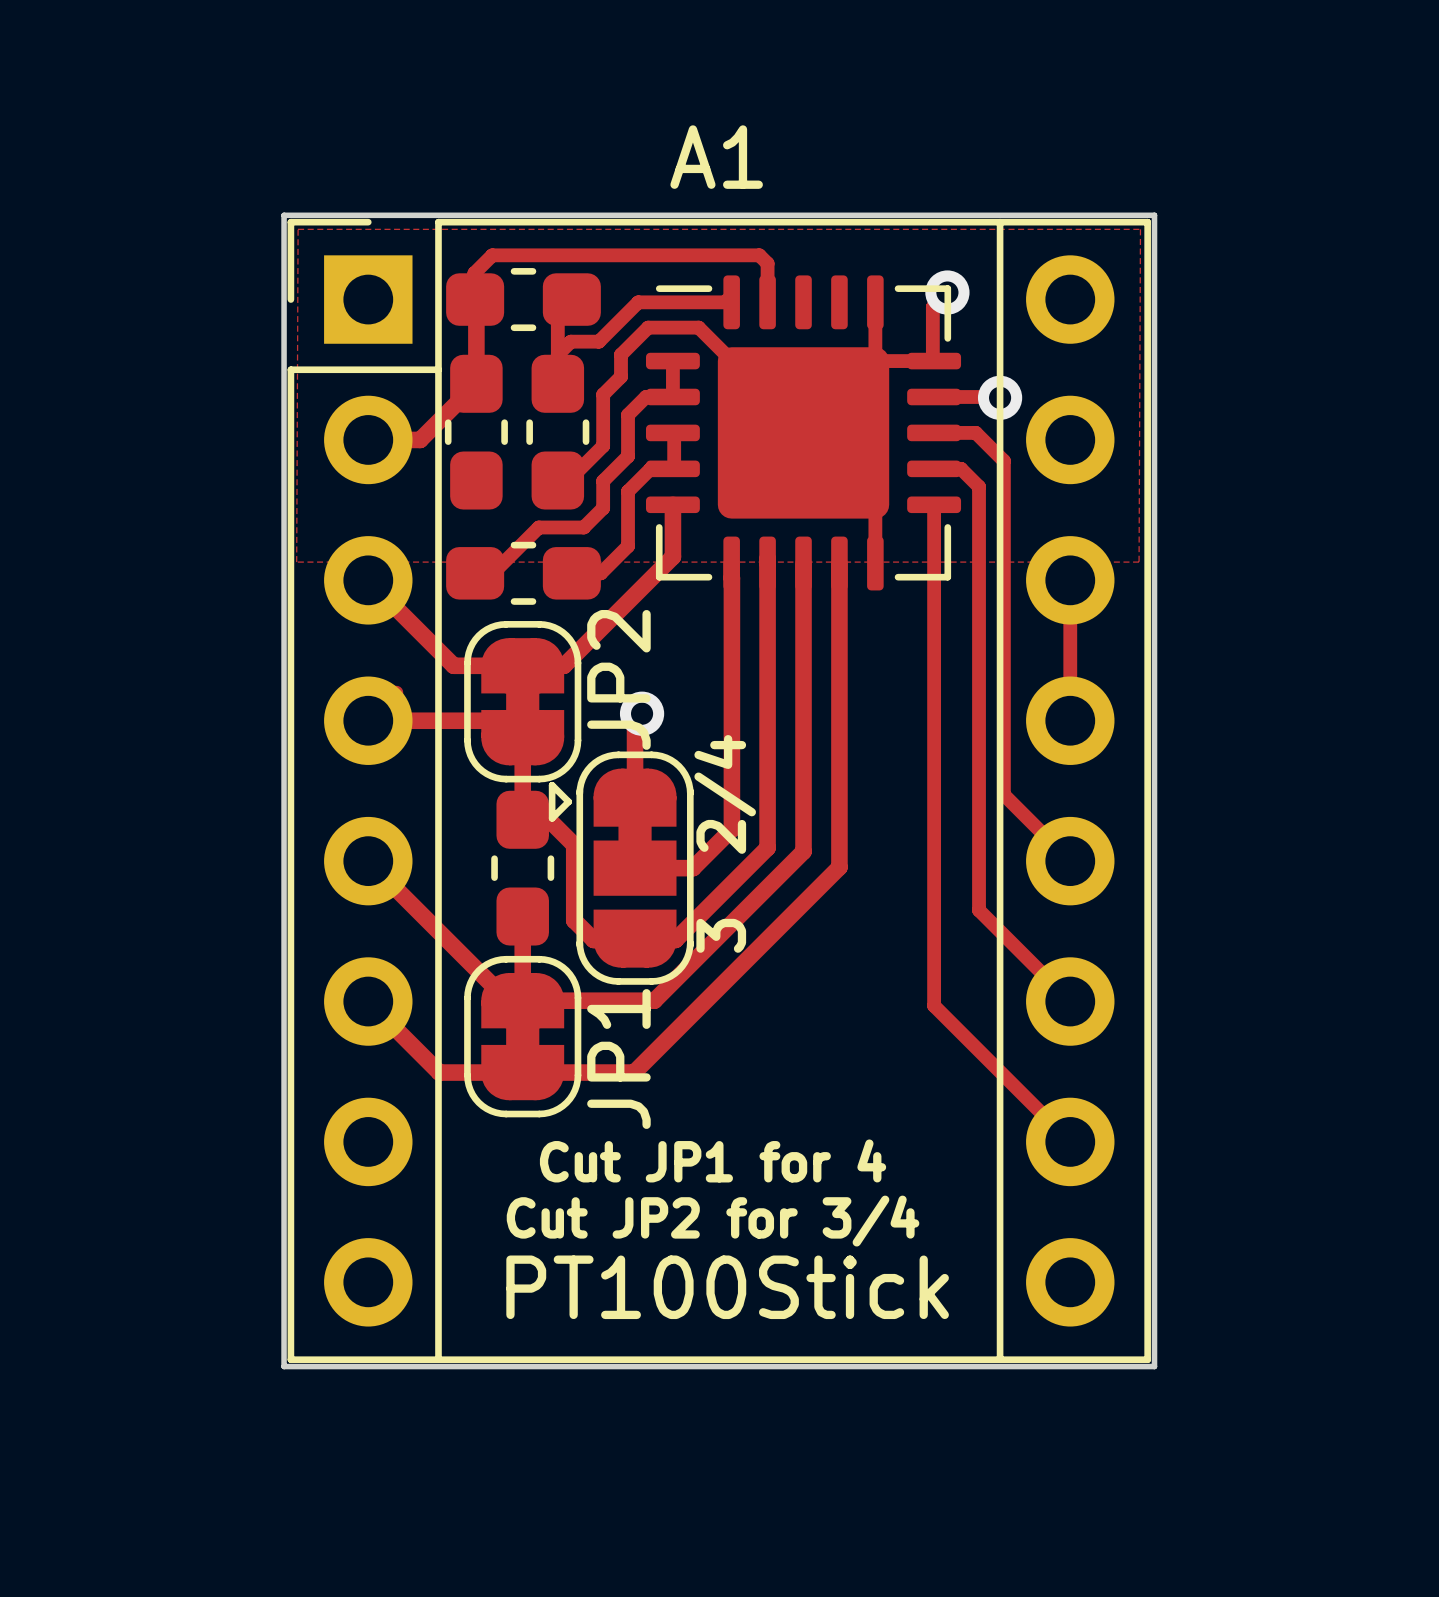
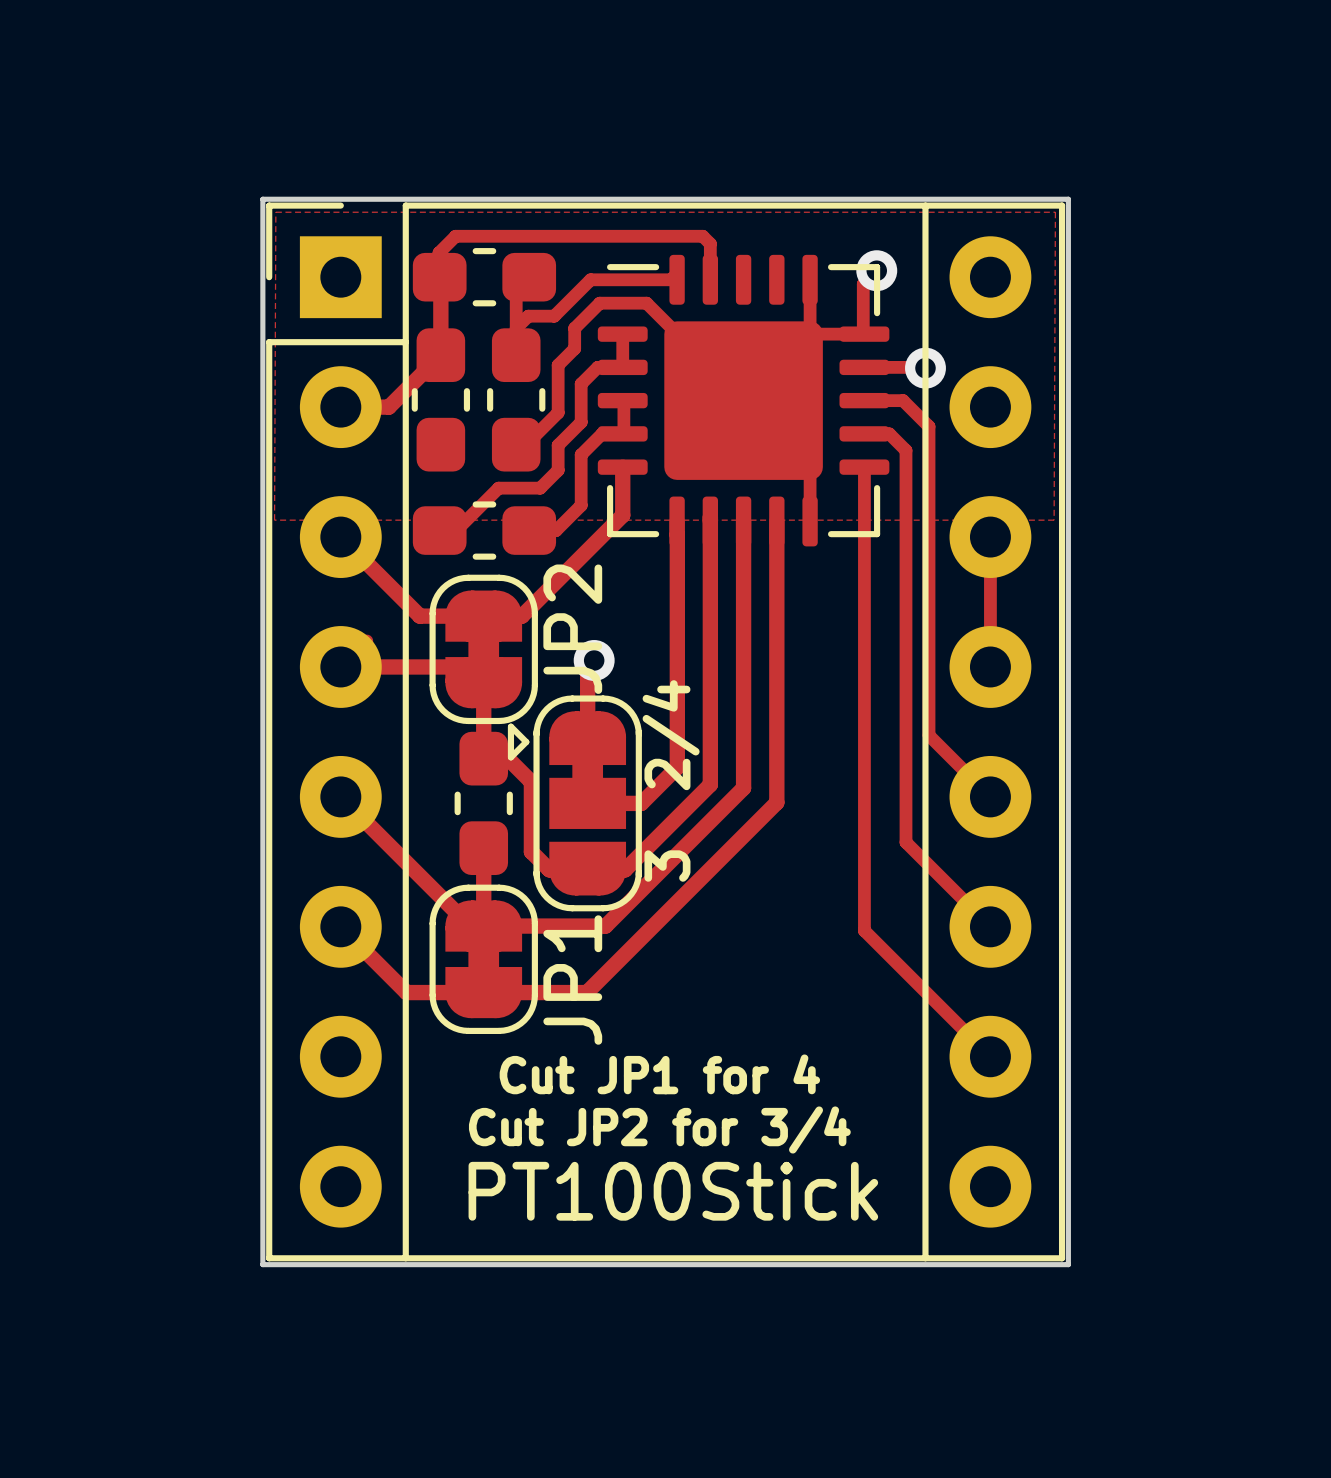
A1: (719, 790) -> none
part: none -> (665, 731)

